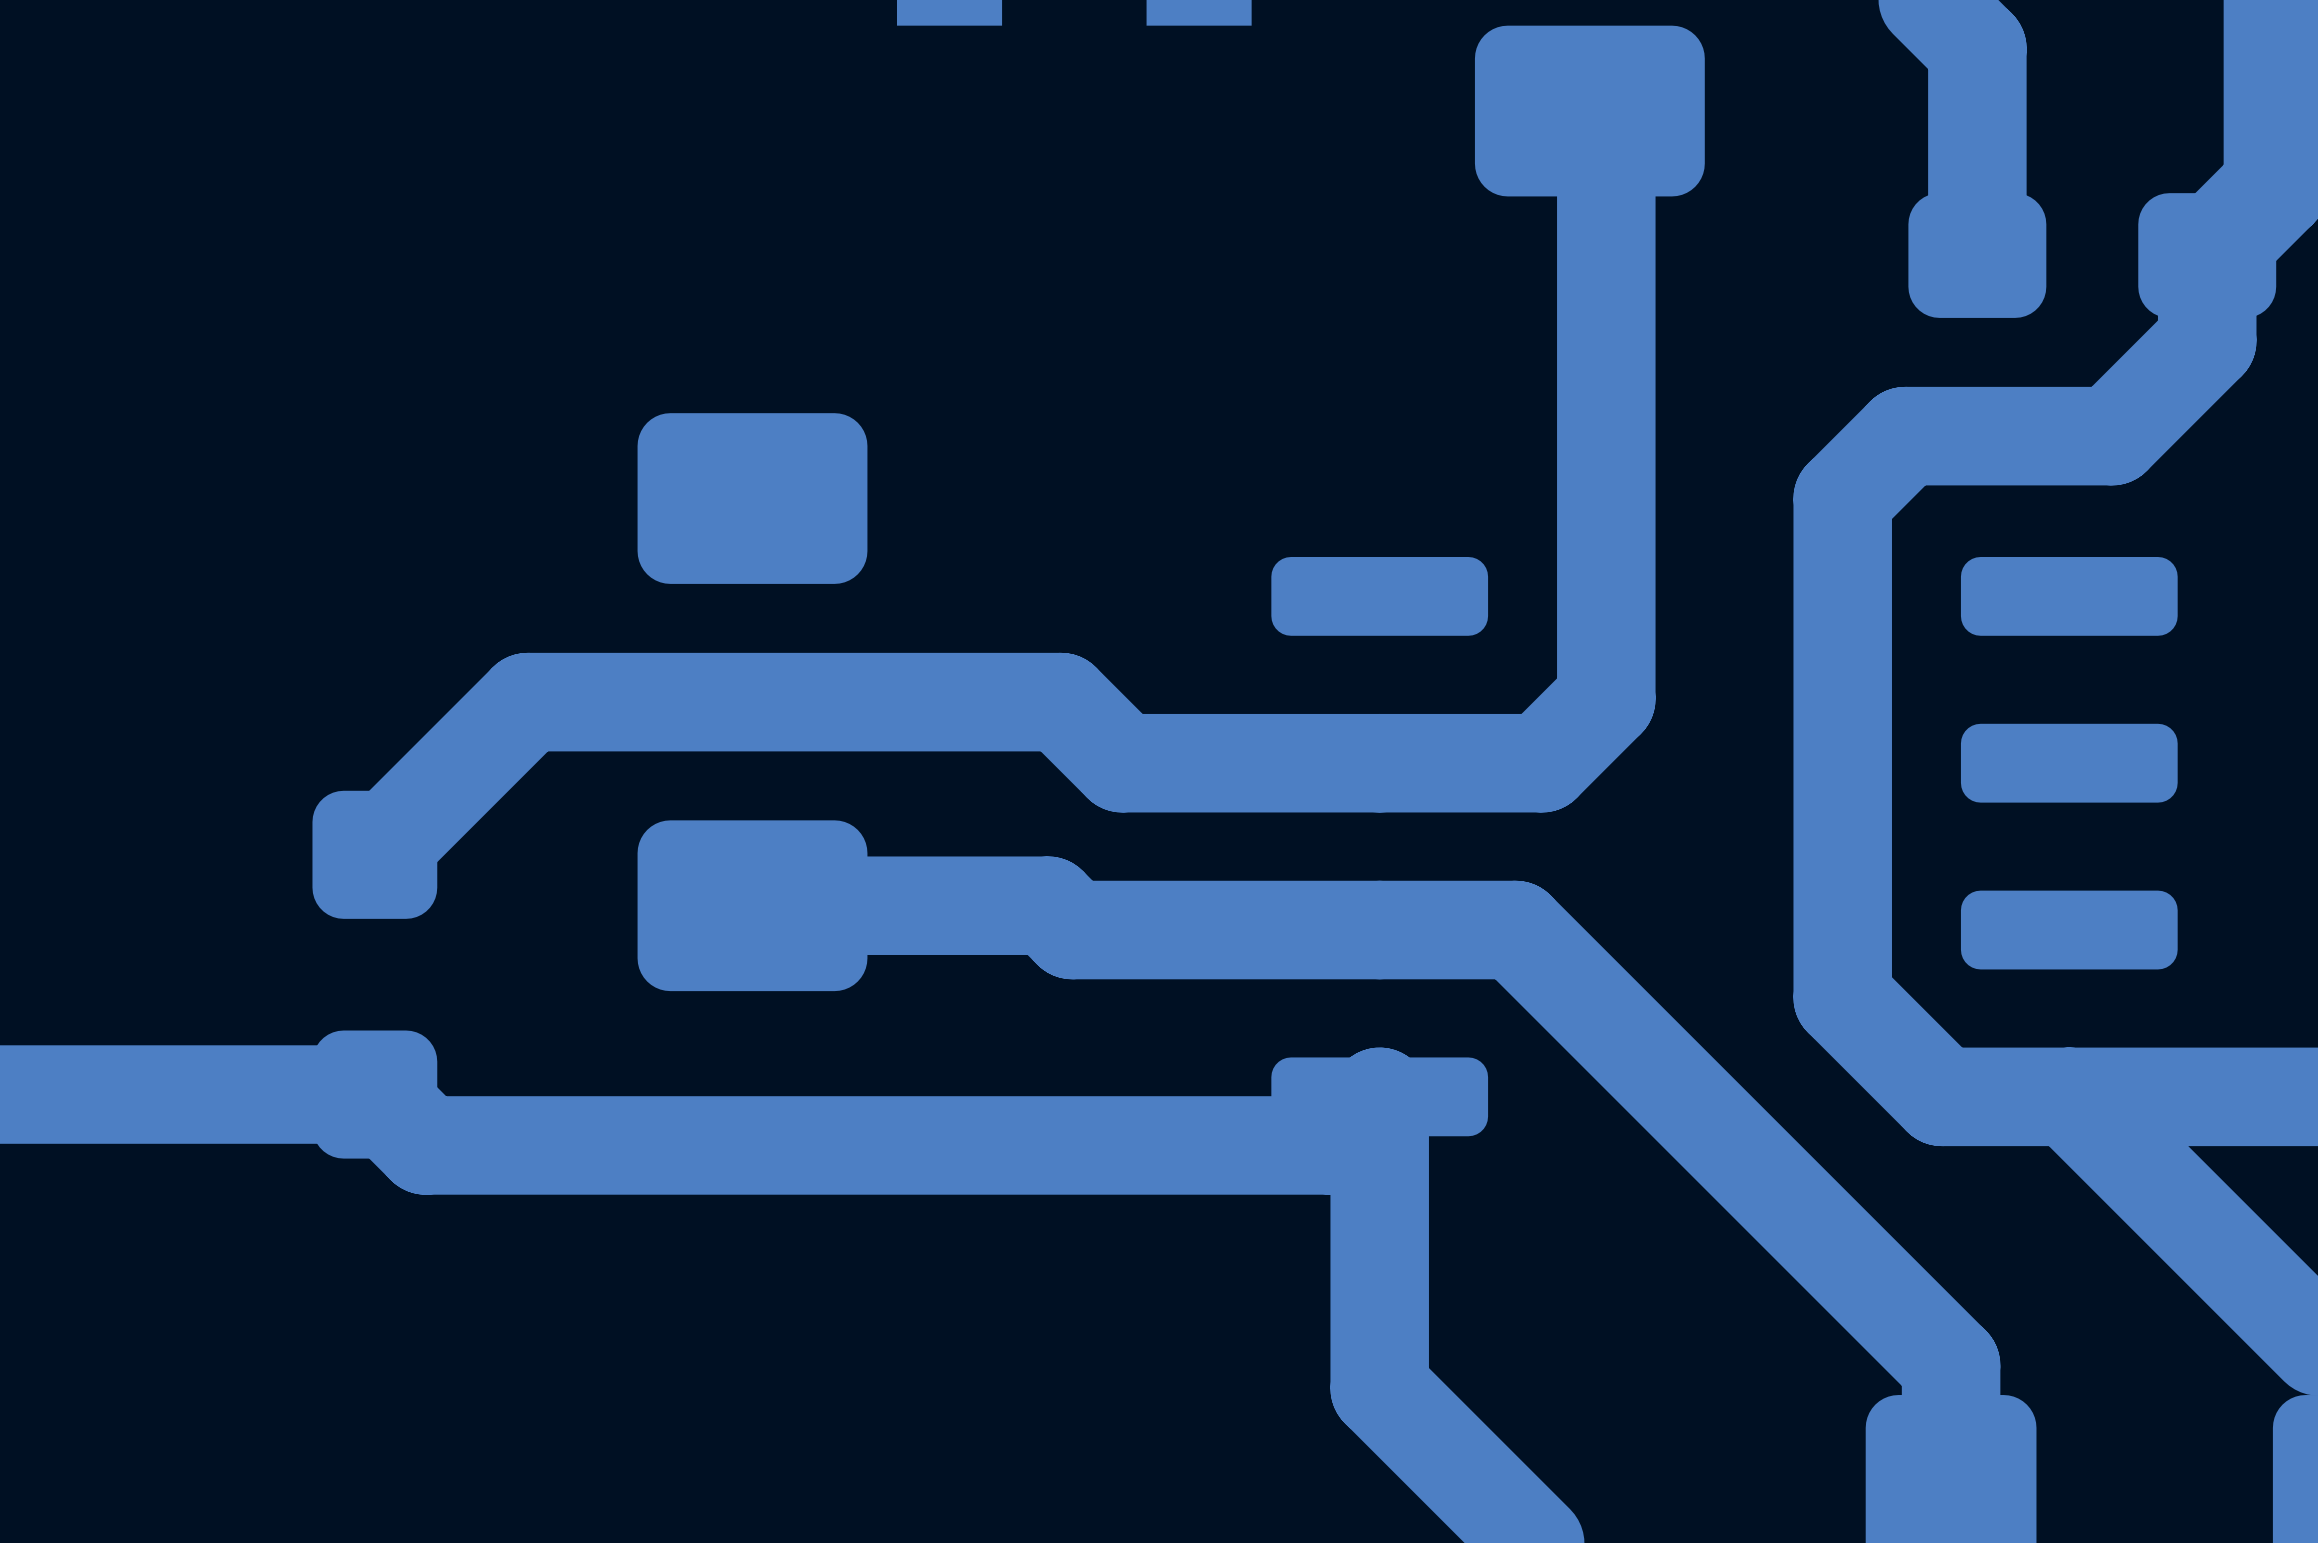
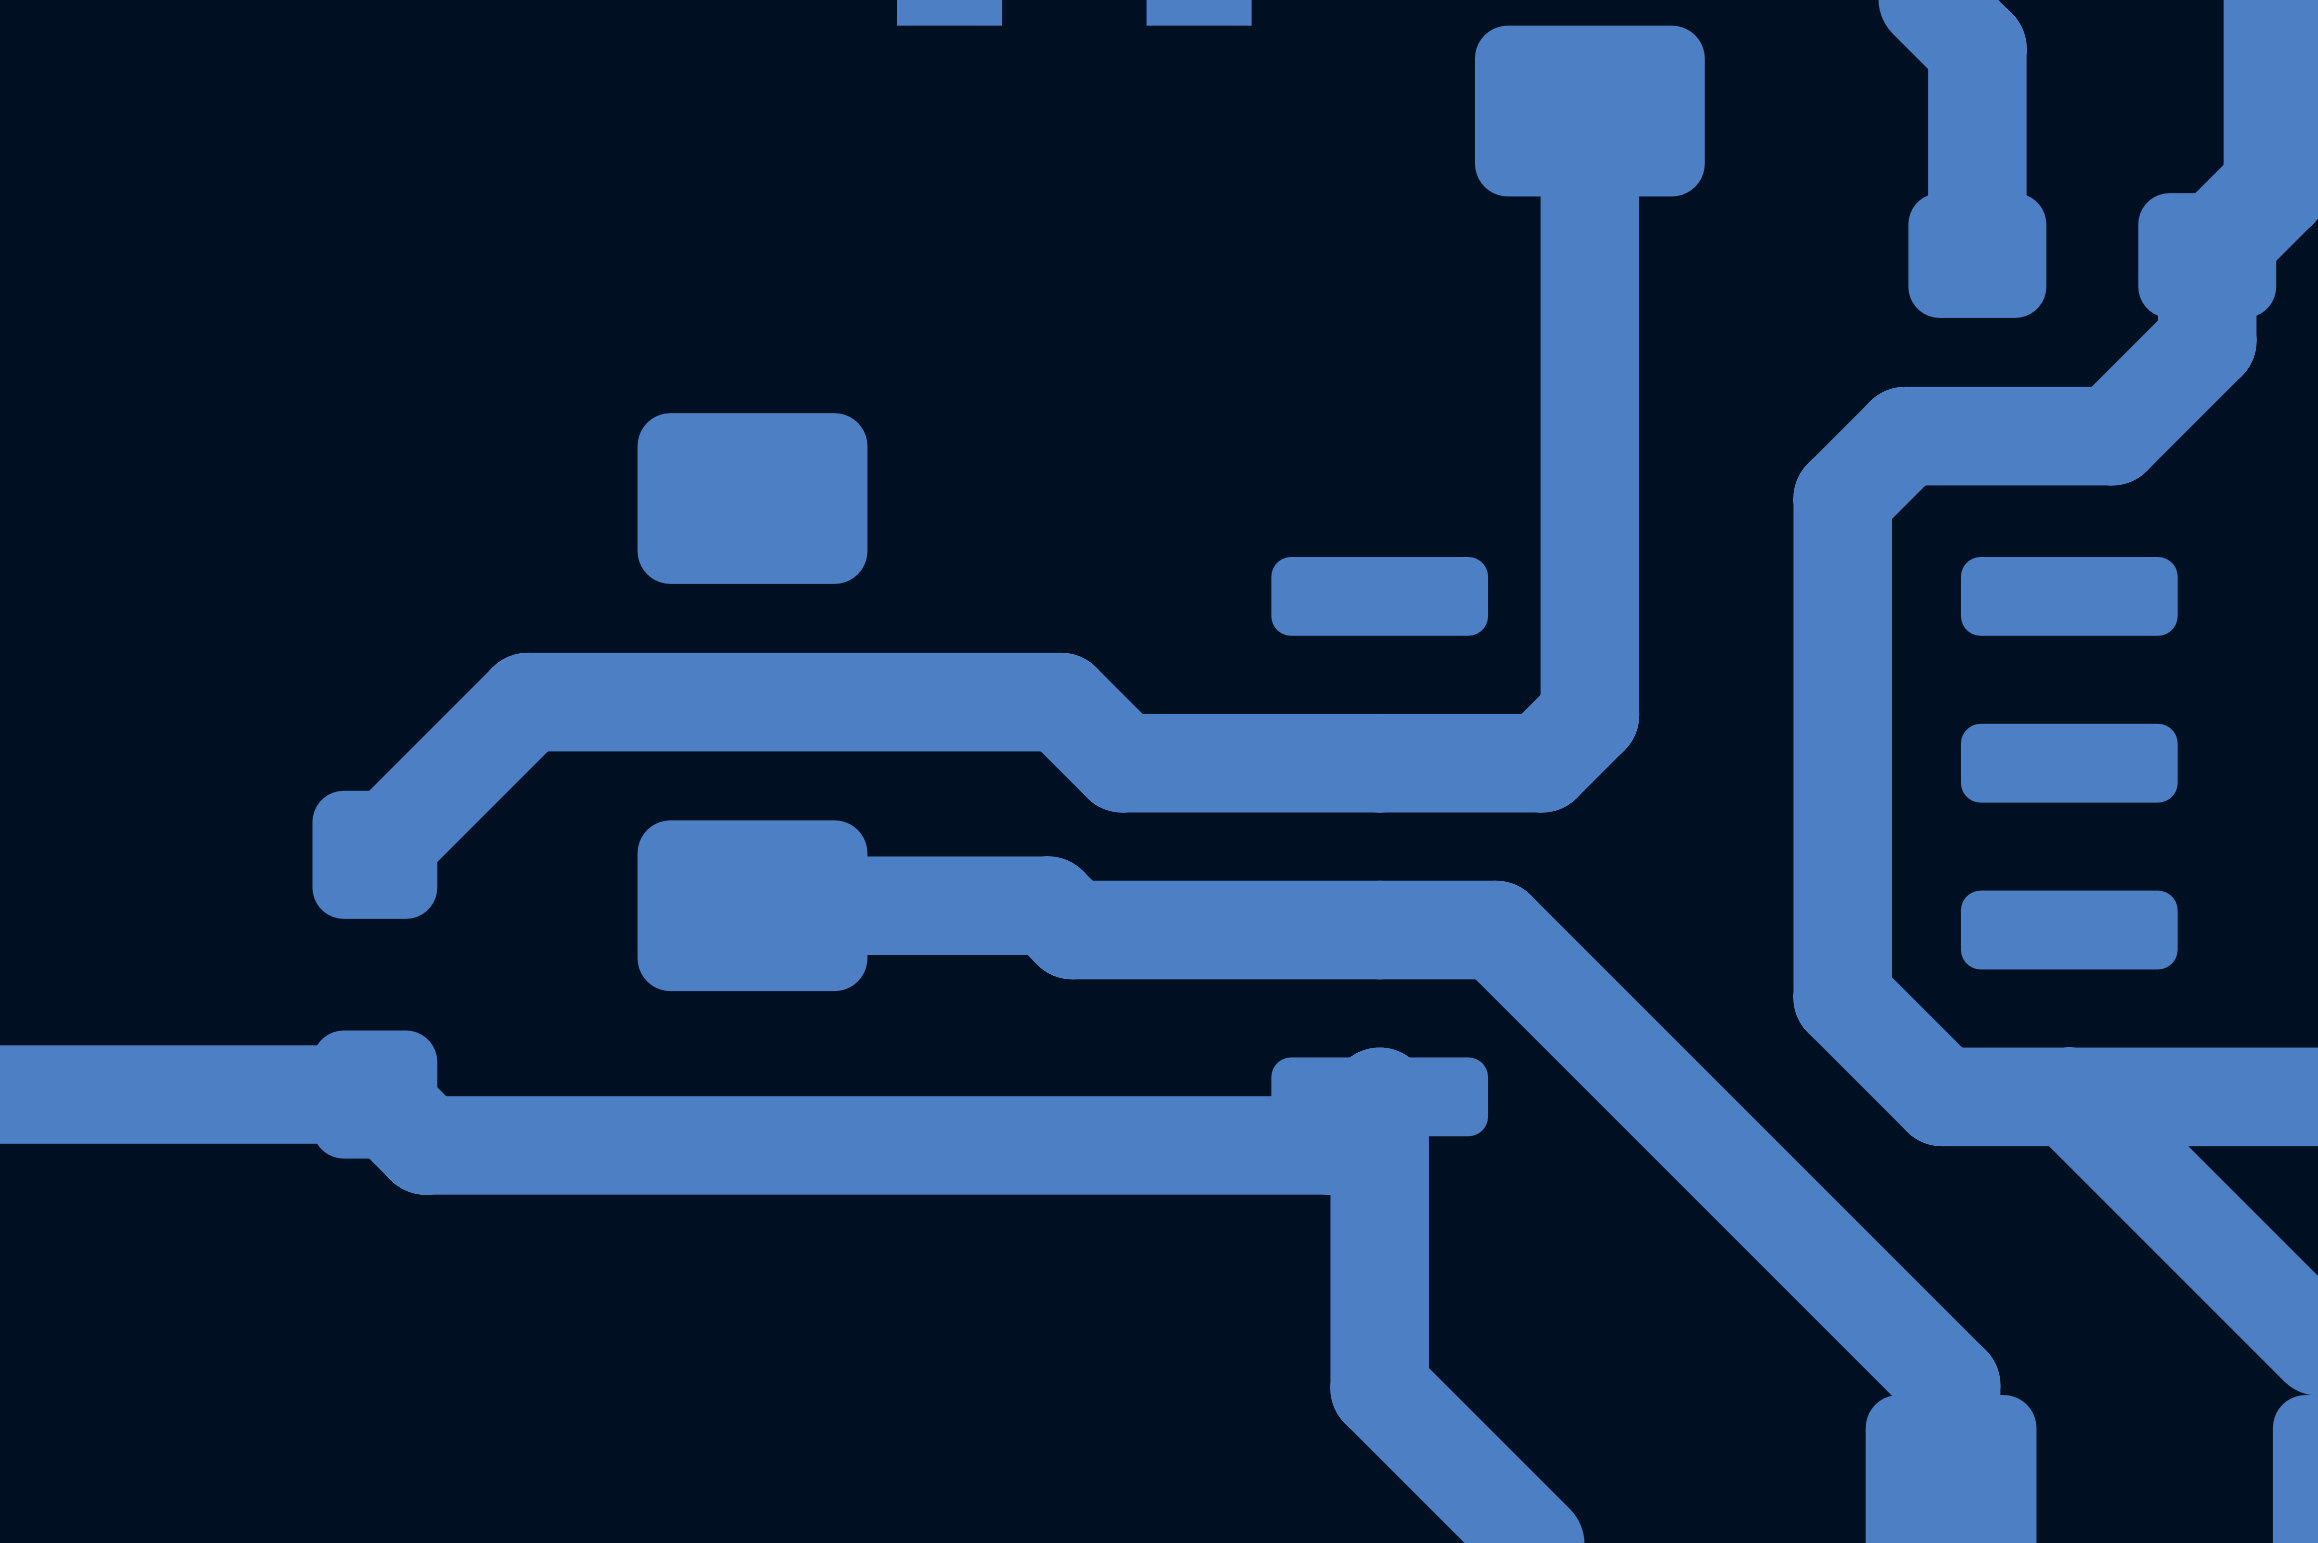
bottom track: (1589, 111) (1606, 127) (1606, 698) (1589, 715) -> (1589, 111) (1589, 715)
bottom track: (1495, 930) (1515, 930) (1951, 1365) (1951, 1385) -> (1495, 930) (1951, 1385)

